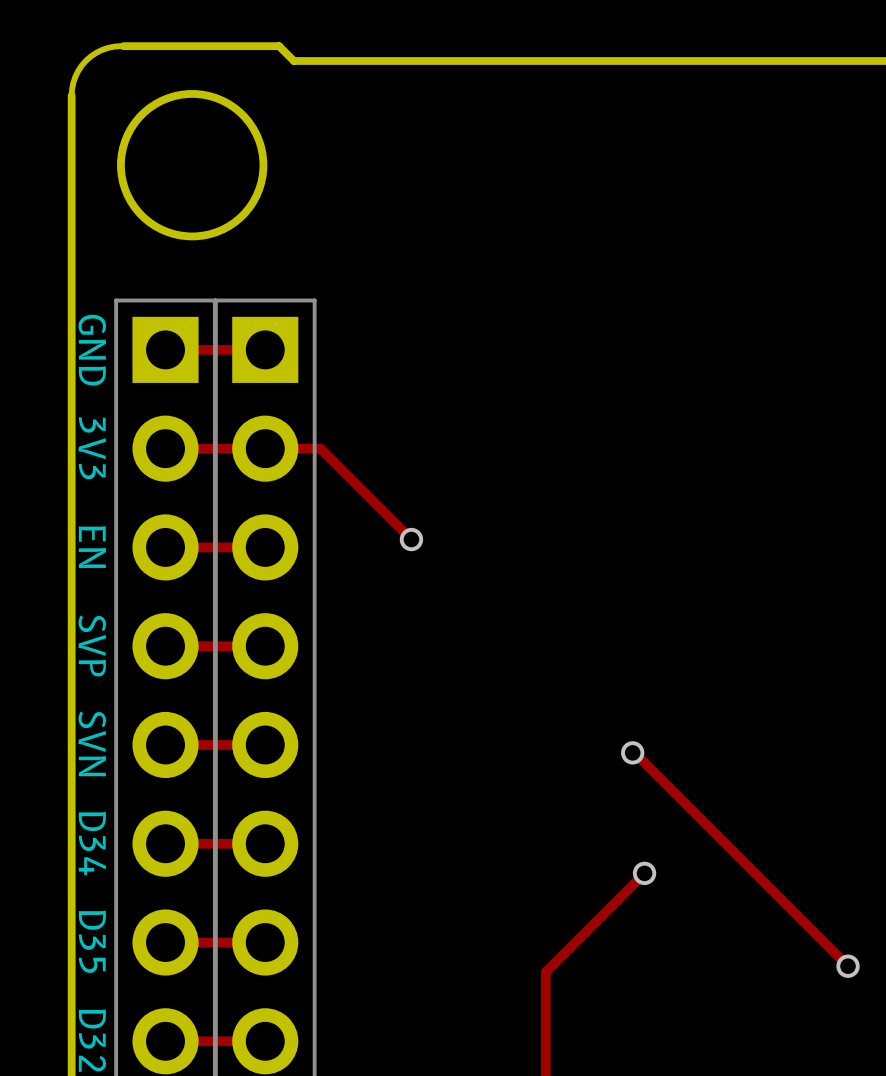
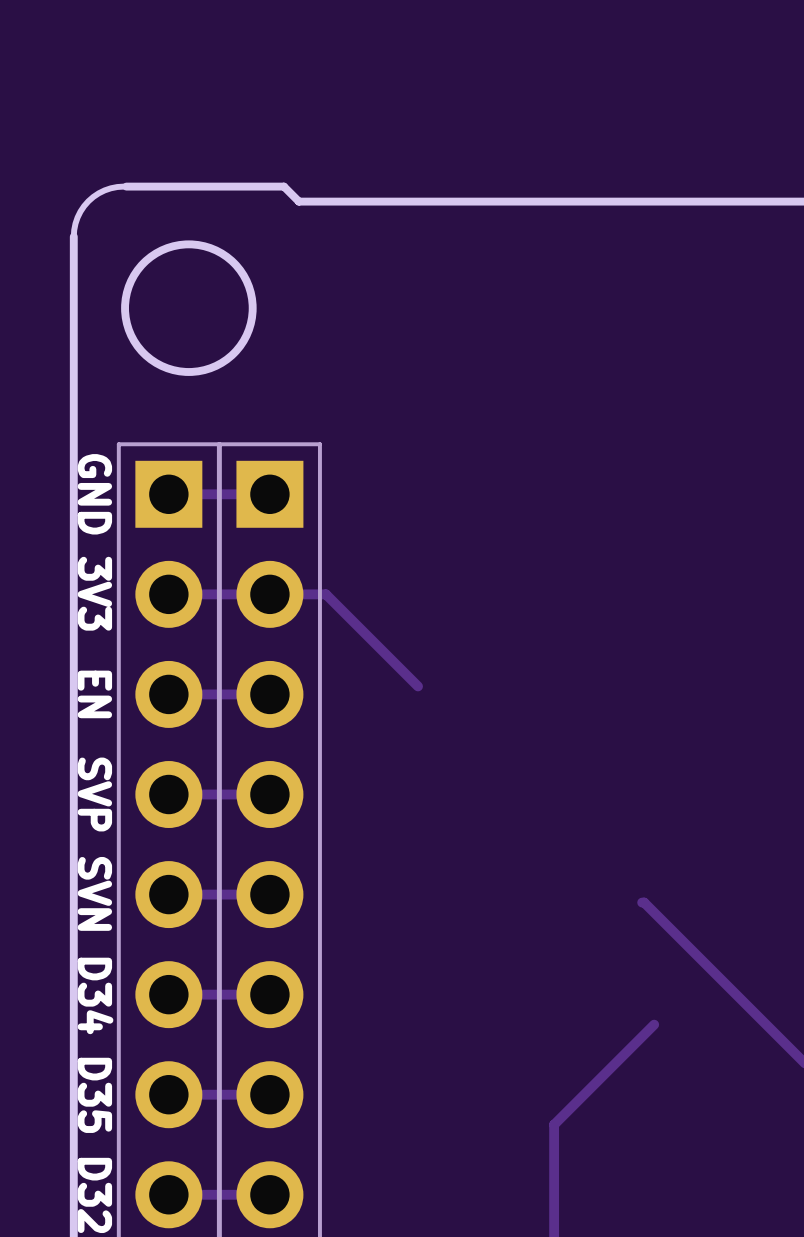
round board edge size: [117, 90, 268, 241] -> [121, 240, 257, 376]
via: (411, 539) -> none
via: (632, 752) -> none
via: (644, 873) -> none

